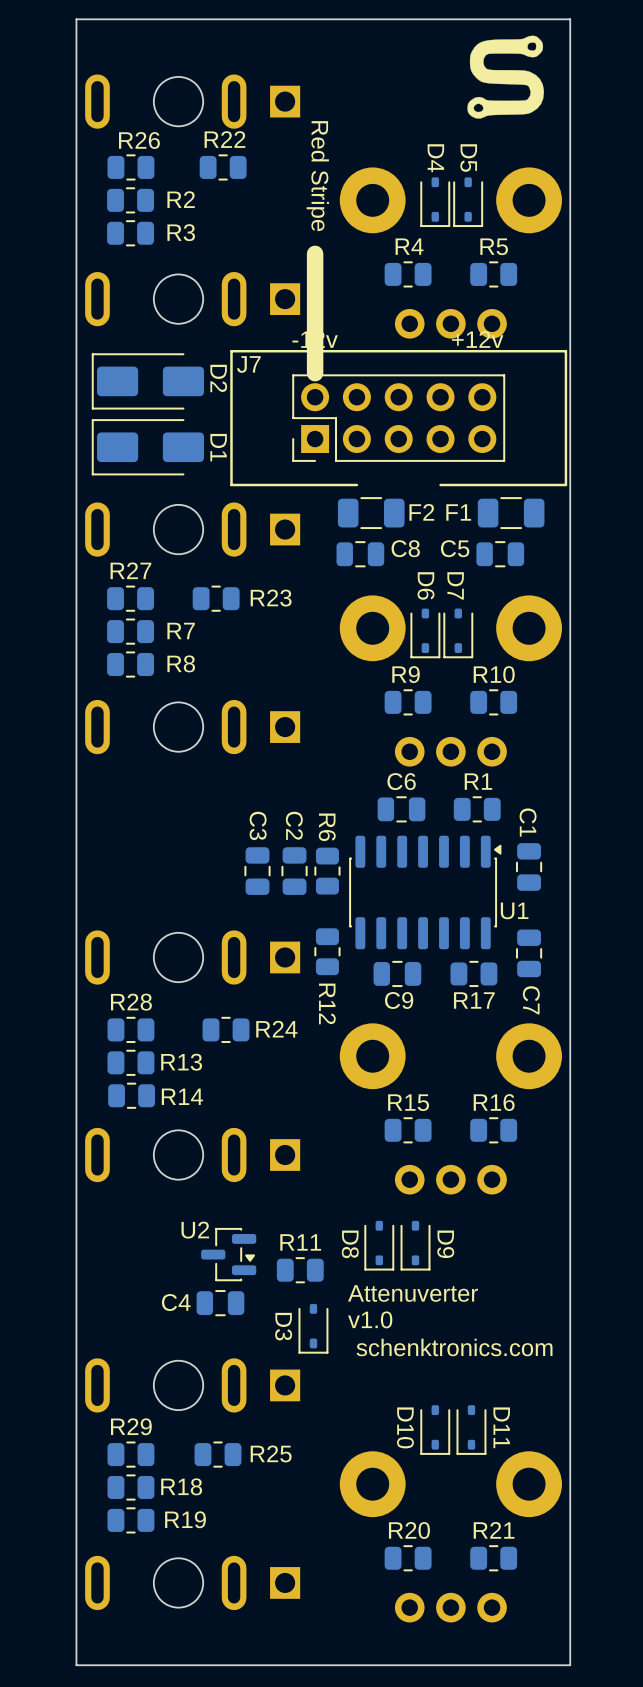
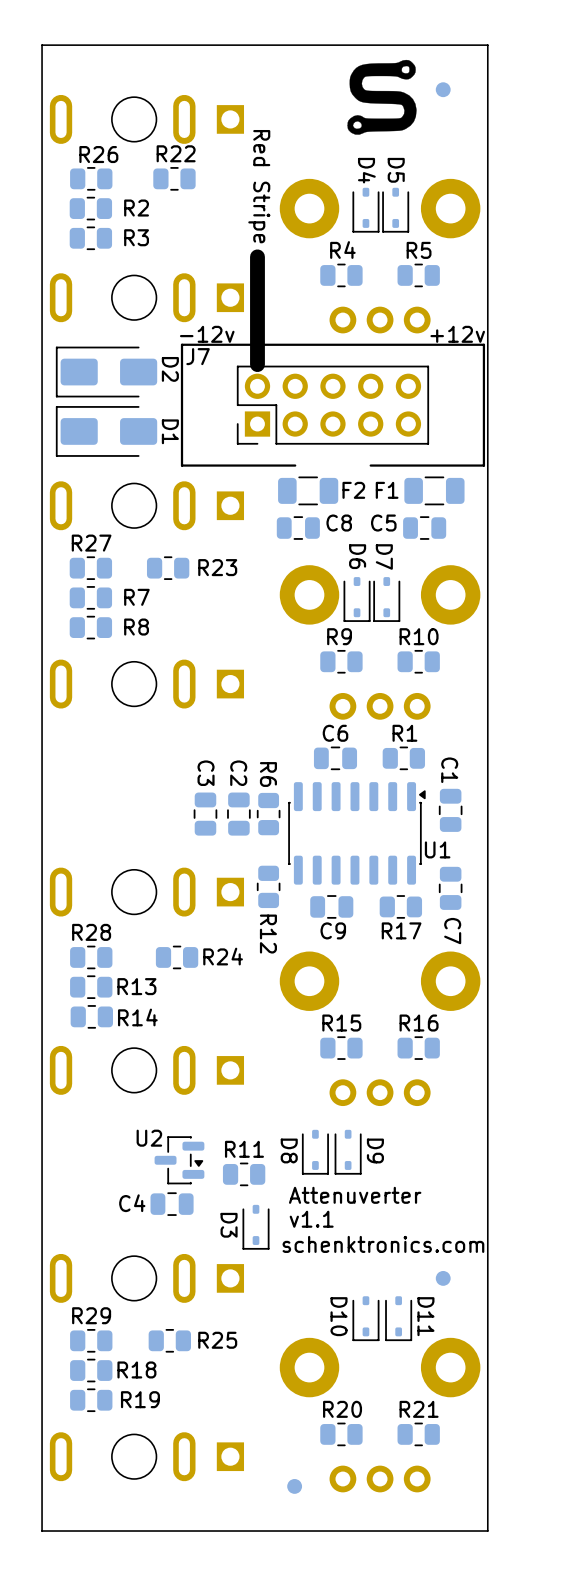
part: none -> (443, 89)
drawing position: (505, 77) -> (382, 97)
text: v1.0 (370, 1319) -> v1.1 (311, 1219)
part: none -> (443, 1278)
part: none -> (294, 1486)

